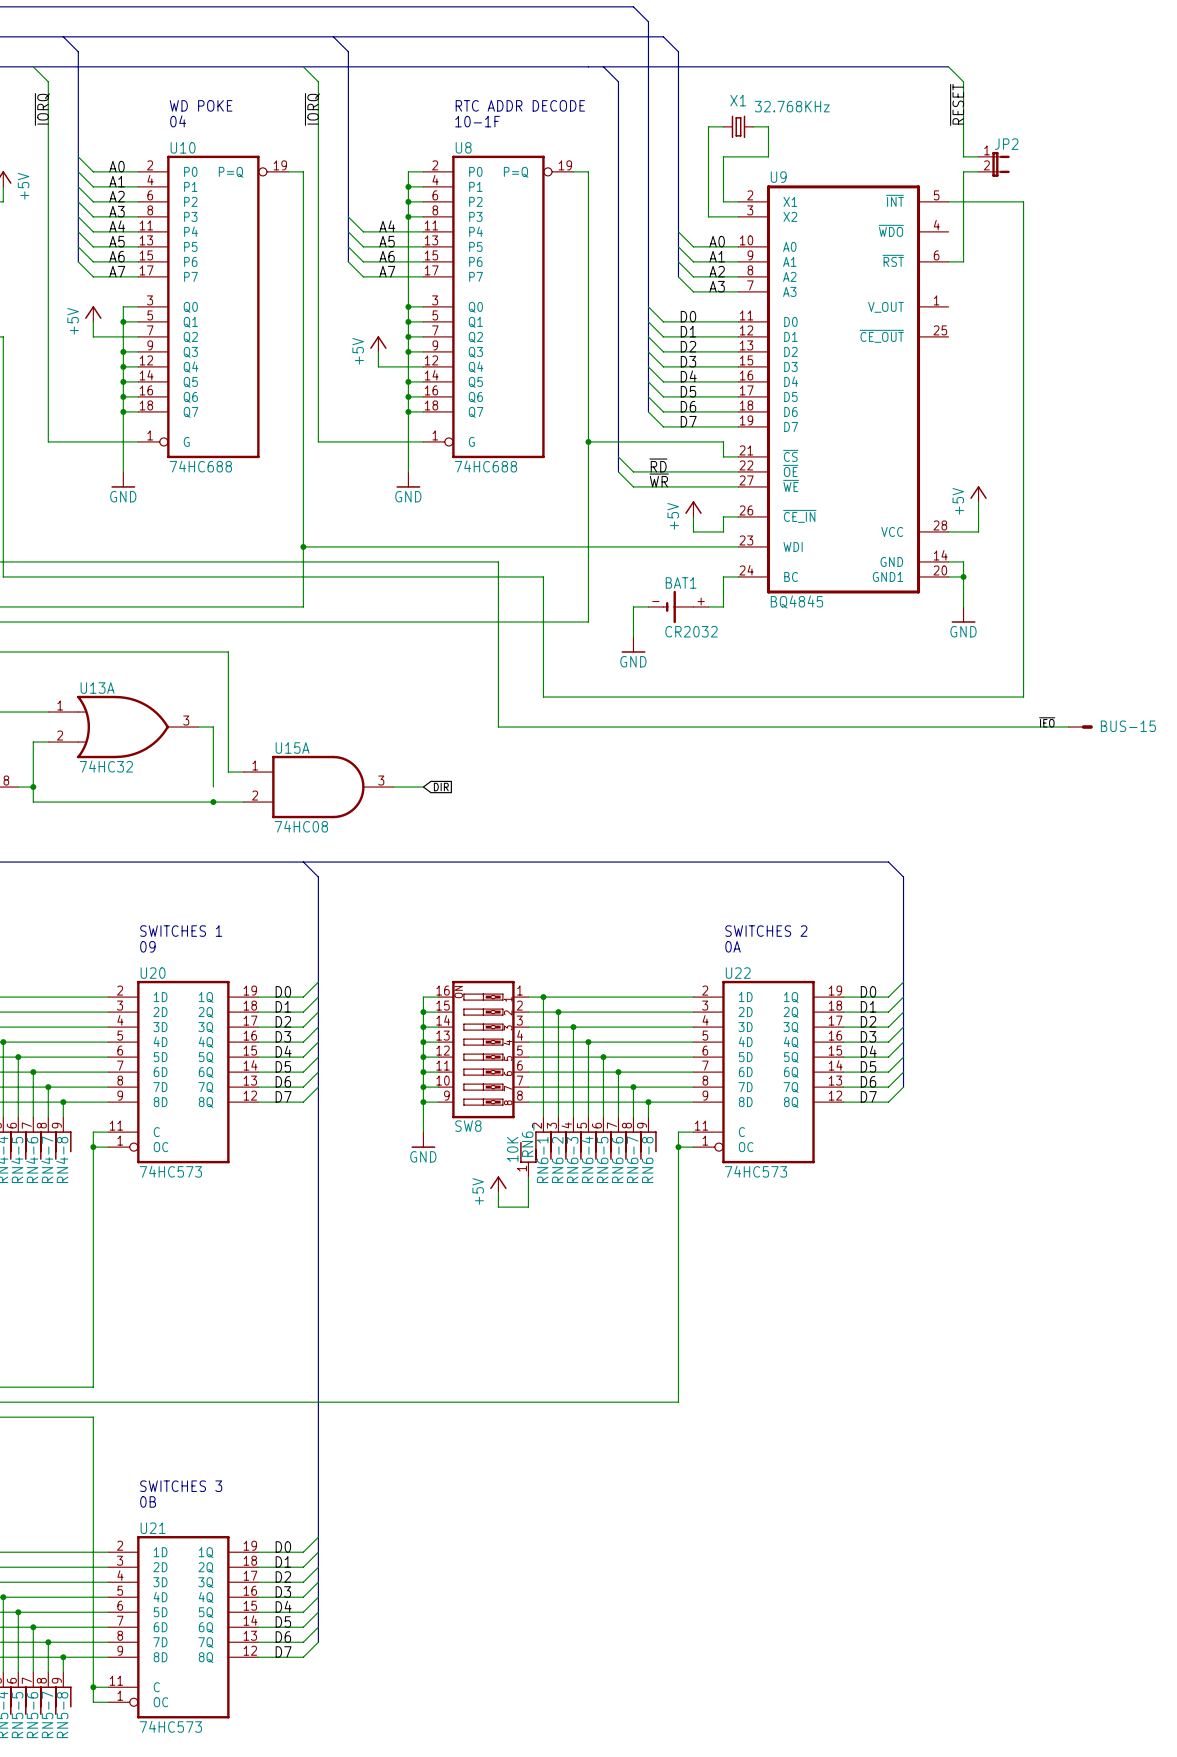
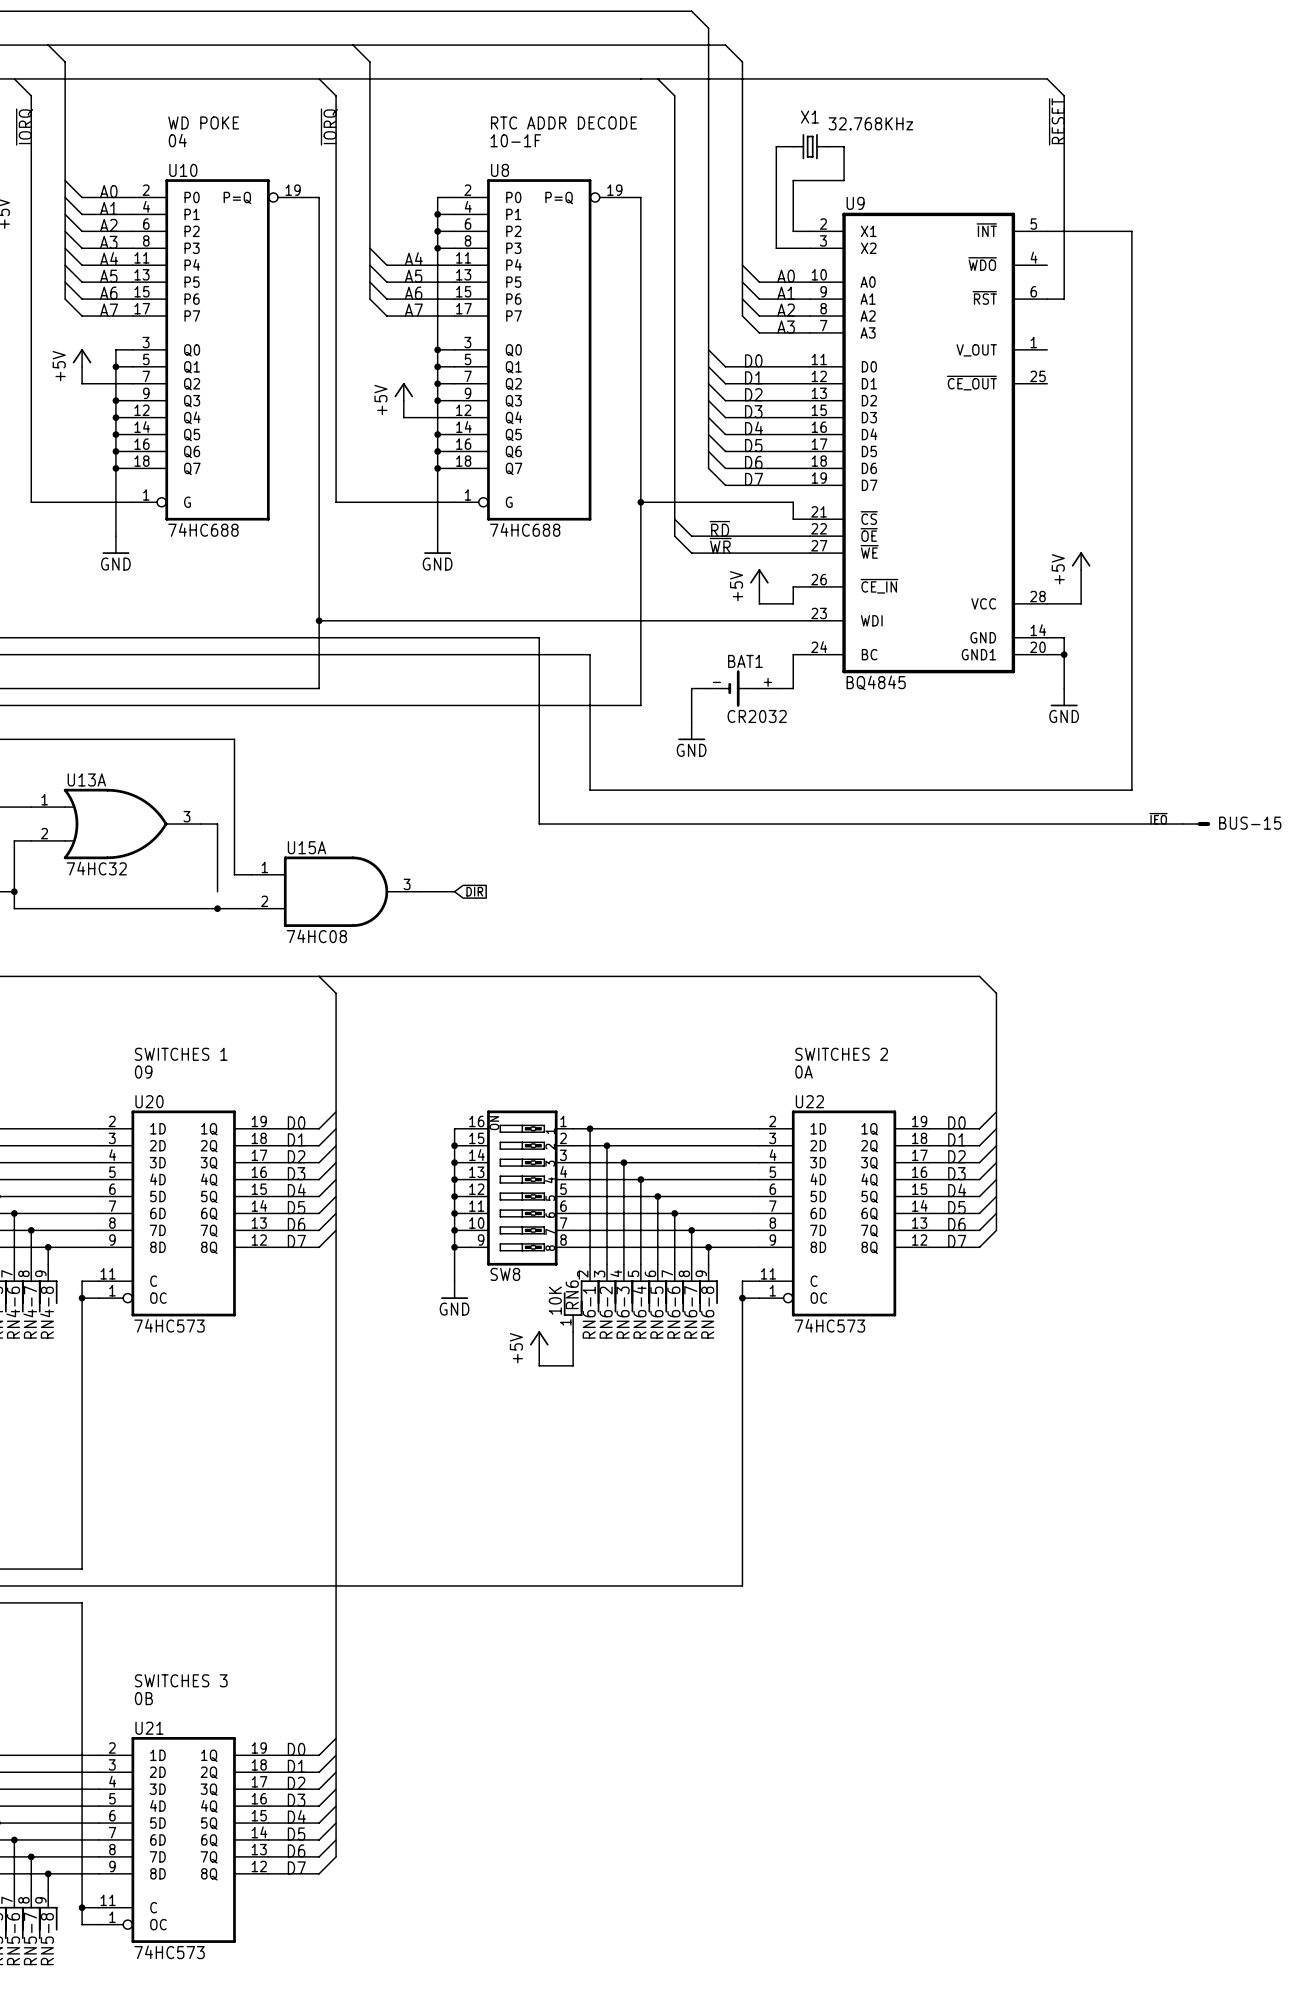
wire: (963, 156) (978, 156) -> (1064, 180) (1064, 197)
JP2: (994, 164) -> none
wire: (963, 171) (978, 171) -> none

